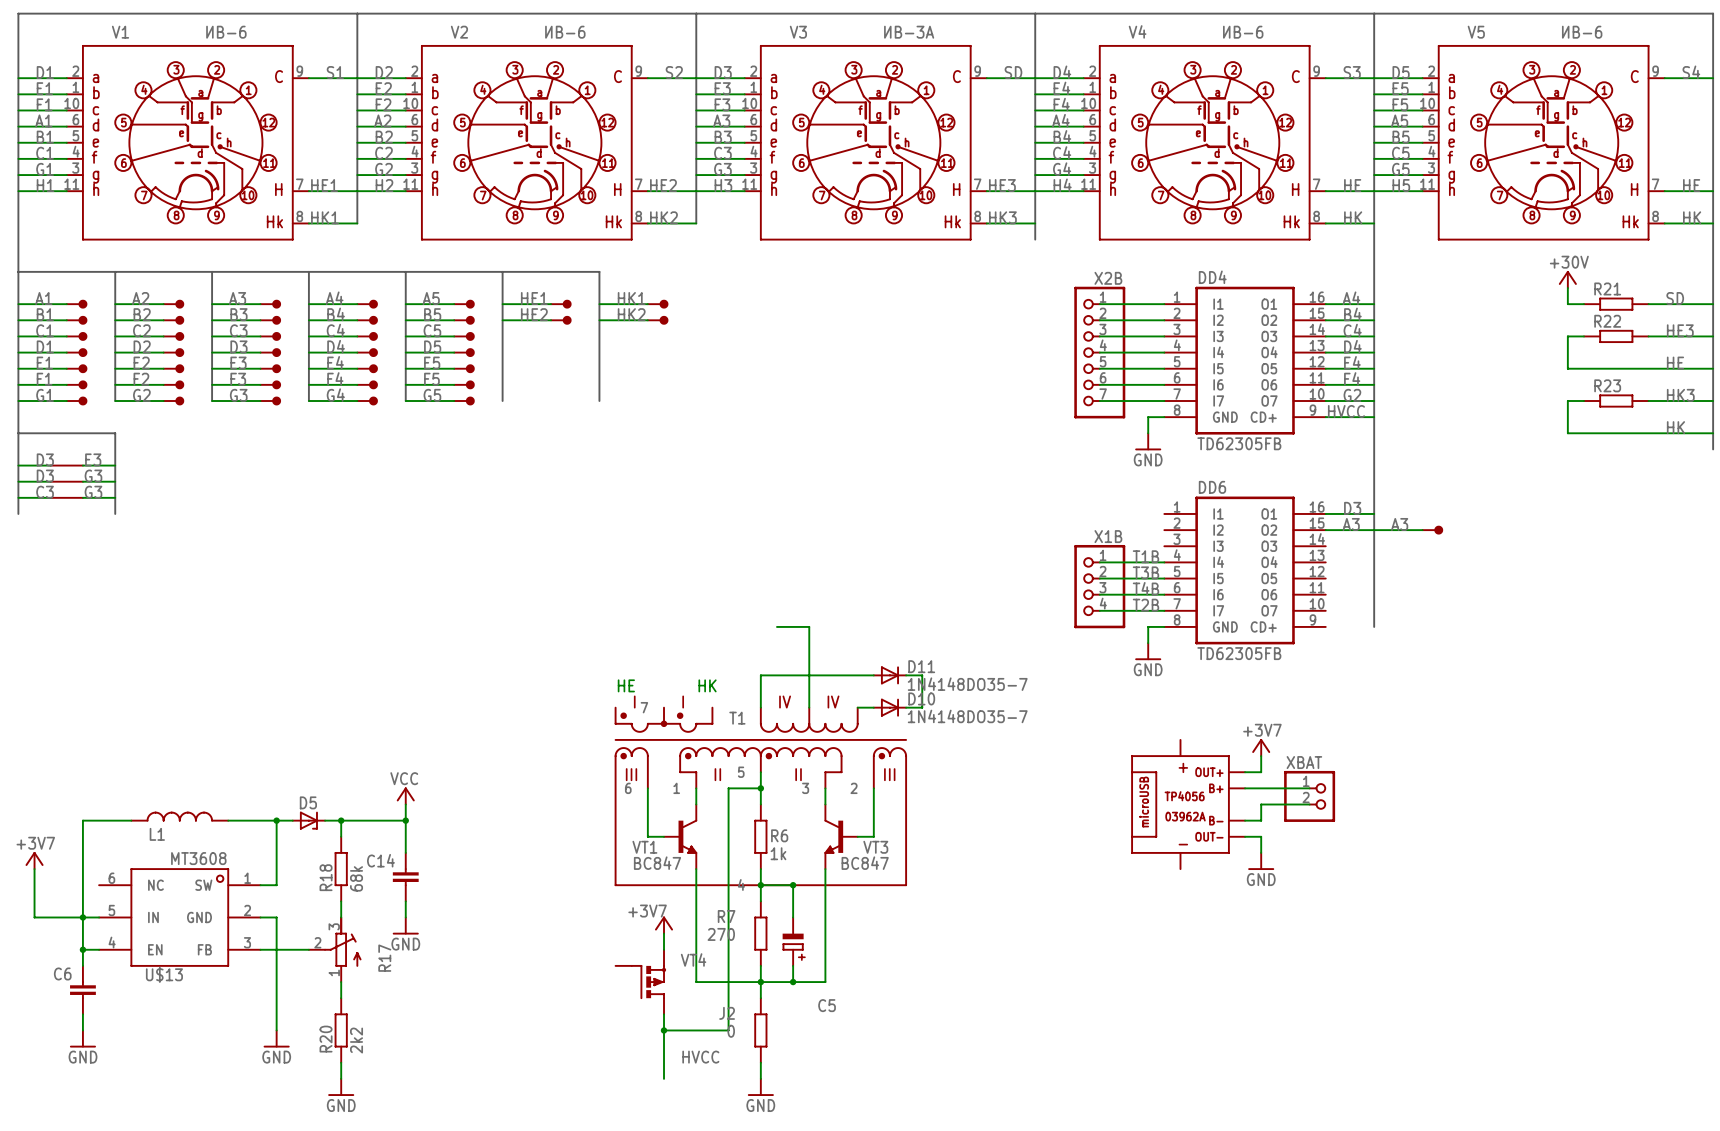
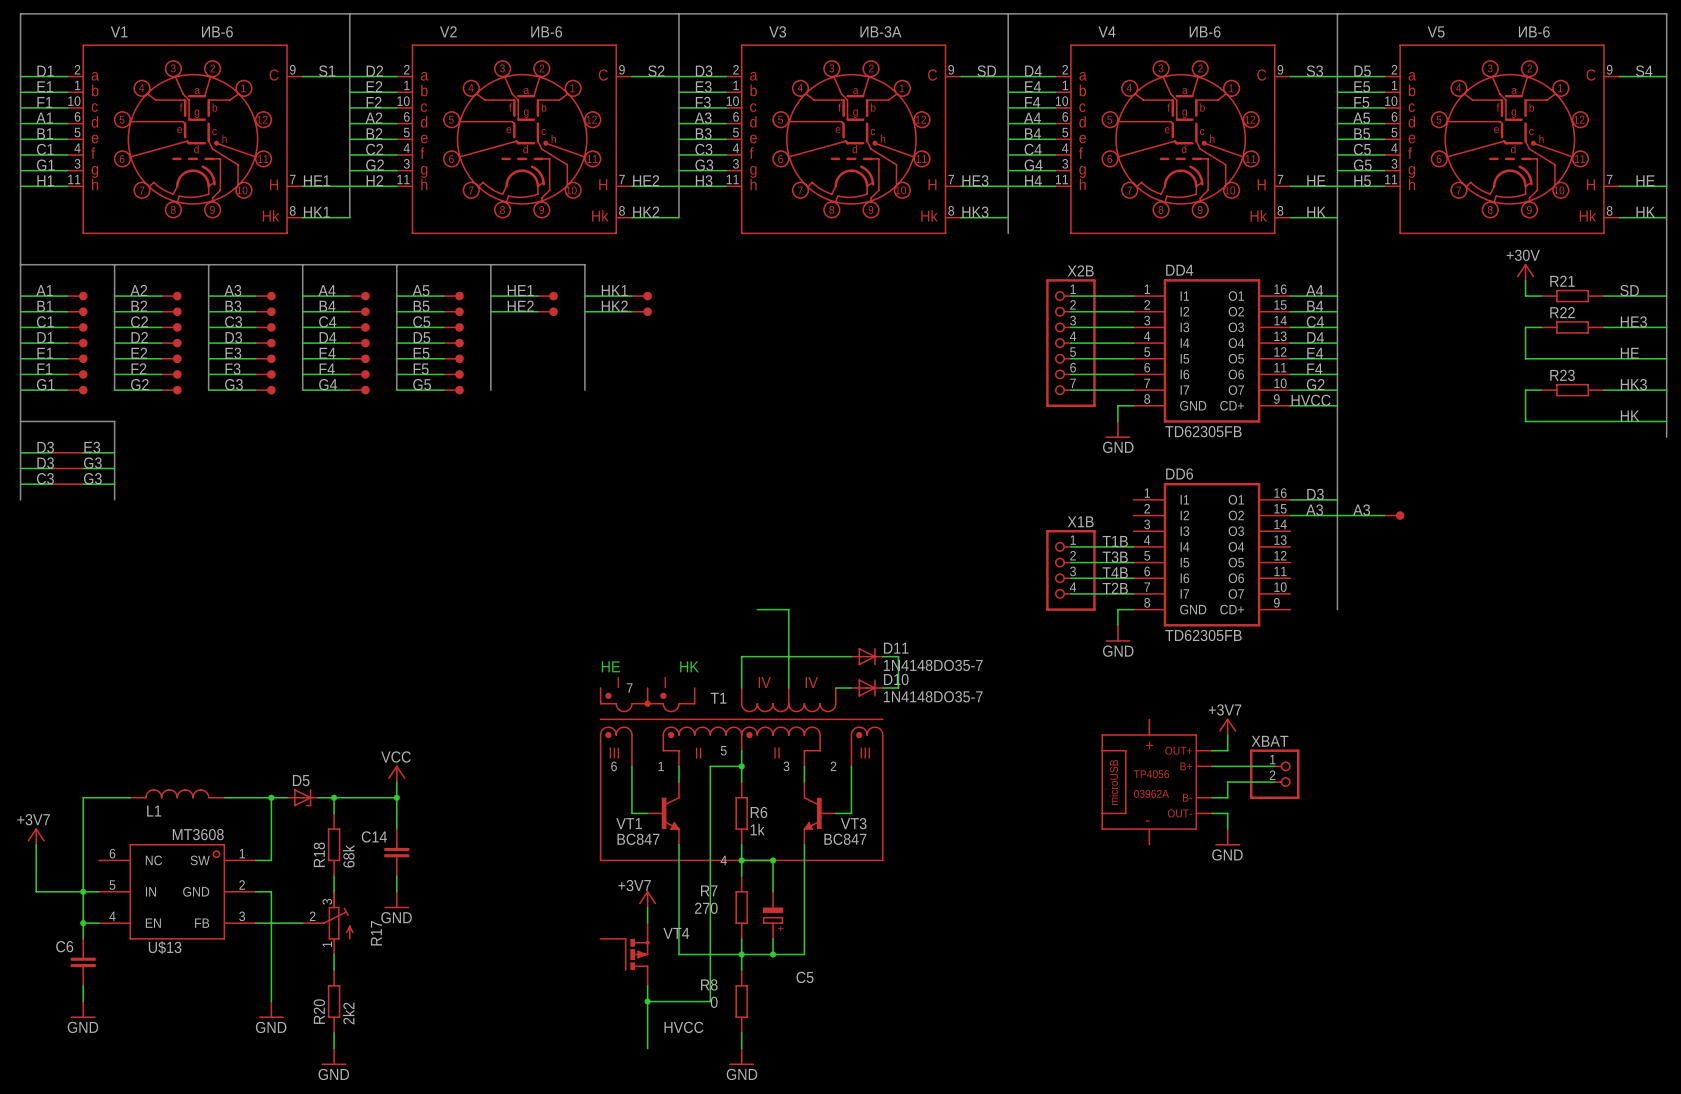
J2 name: J2 (727, 1013) -> R8 (709, 984)

